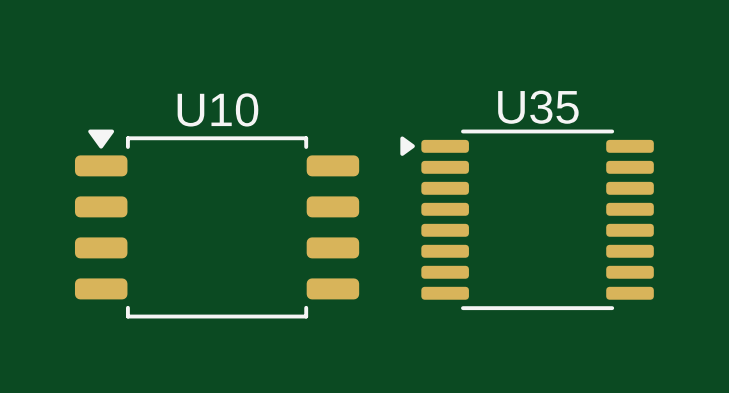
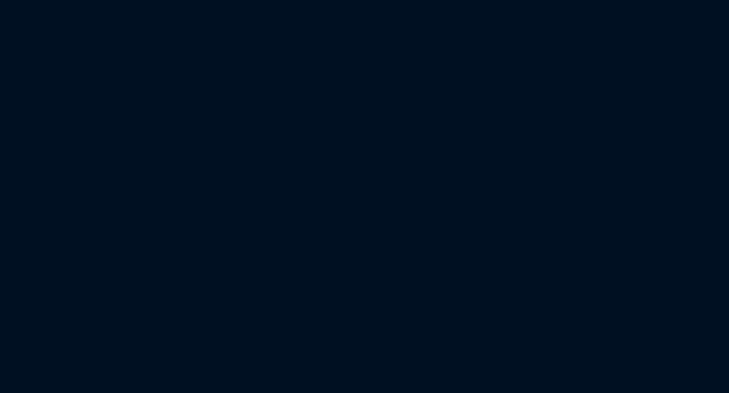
U35: (527, 219) -> none
U10: (217, 224) -> none

